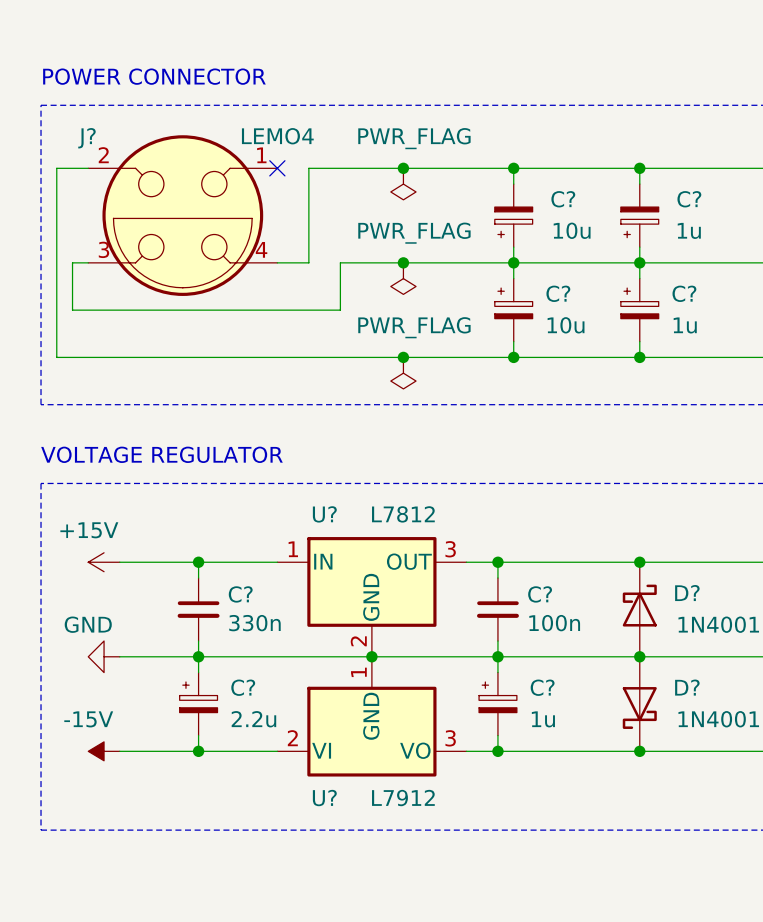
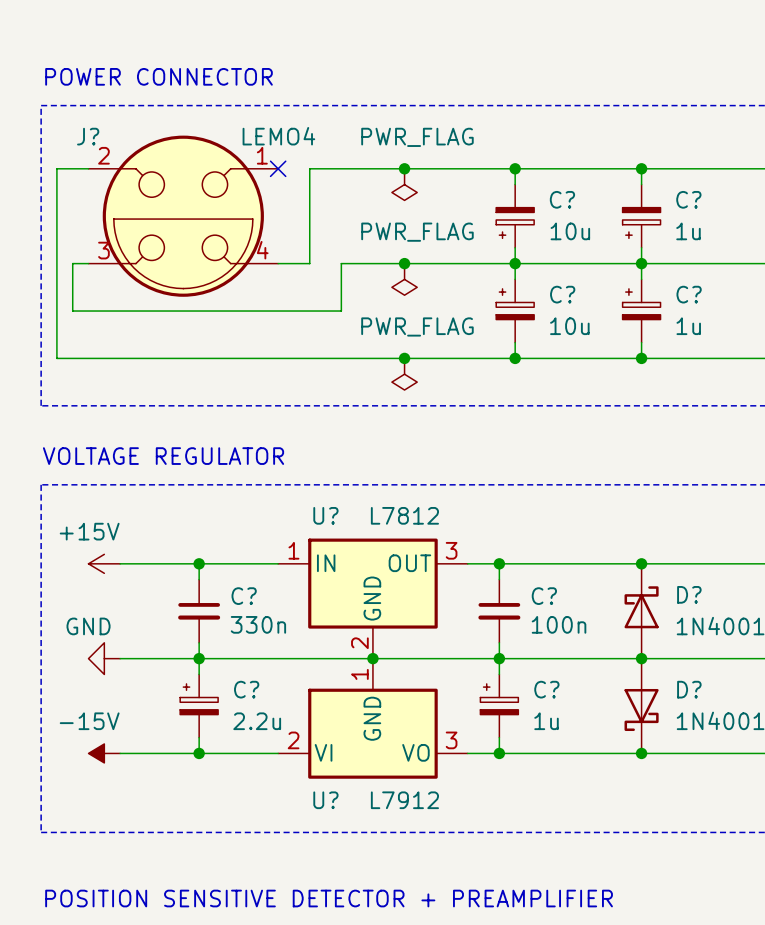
text: none -> POSITION SENSITIVE DETECTOR + PREAMPLIFIER (329, 898)

